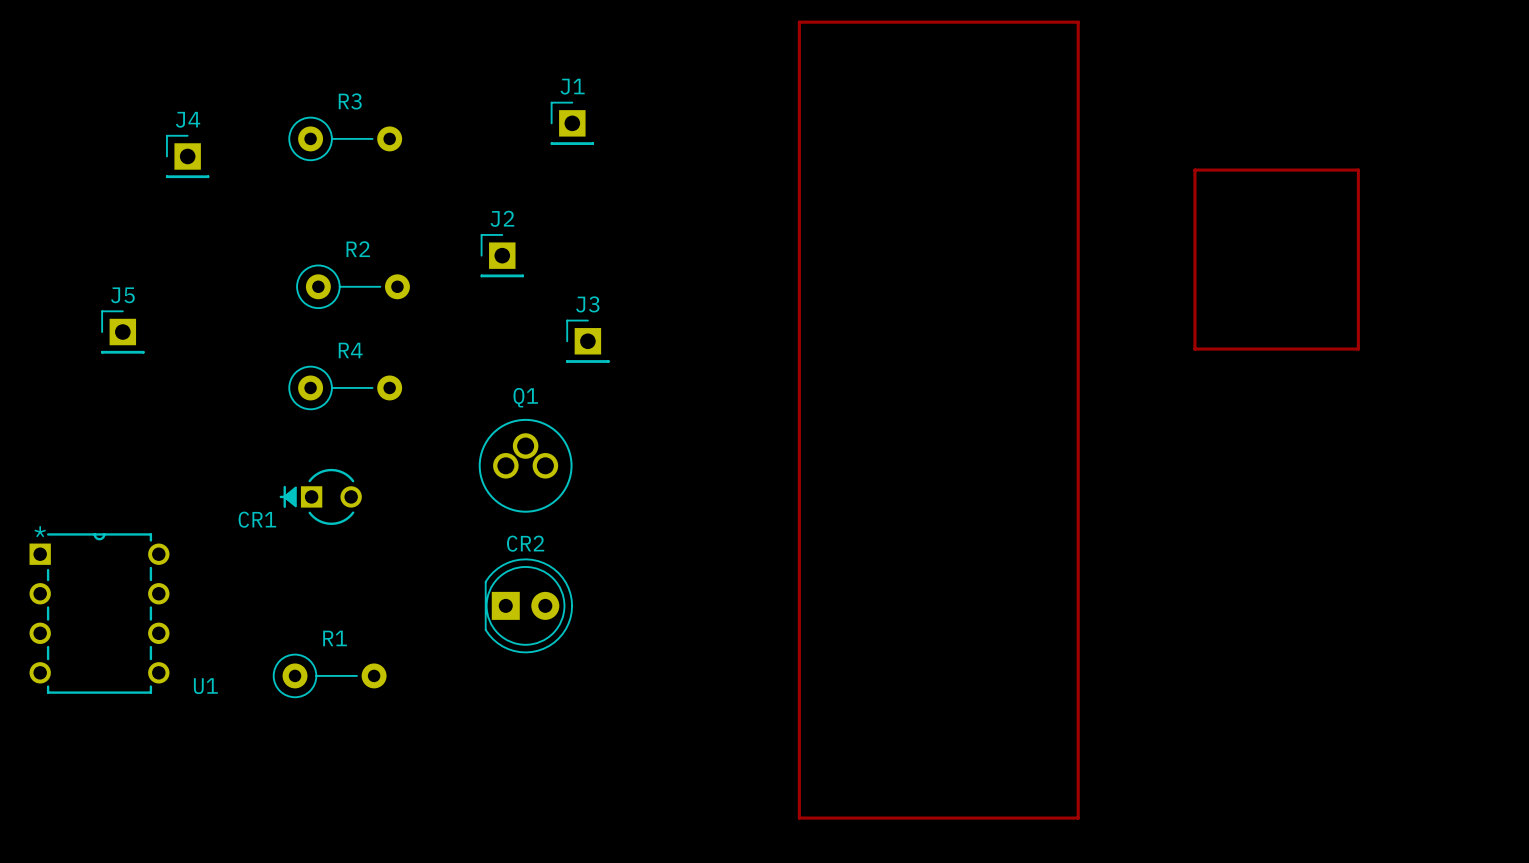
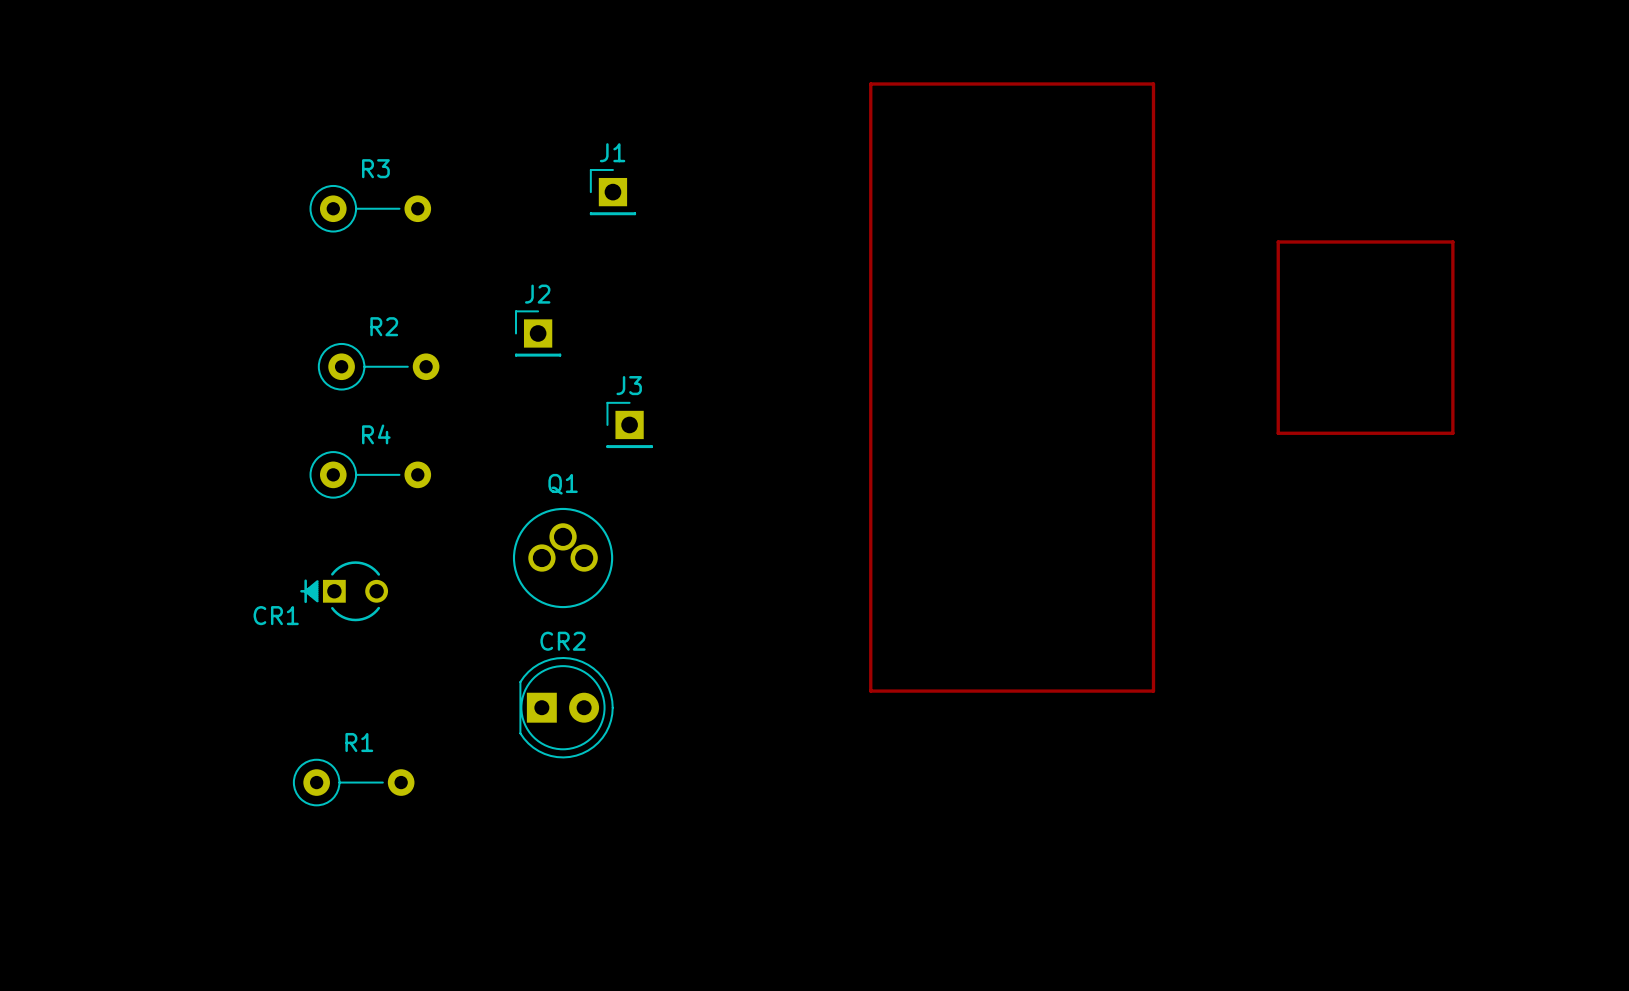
top track: (813, 22) (799, 22) (799, 818) (1078, 818) (1078, 590) -> (870, 84) (870, 691) (1153, 691)
J4: (187, 156) -> none
J5: (122, 332) -> none
U1: (99, 613) -> none

